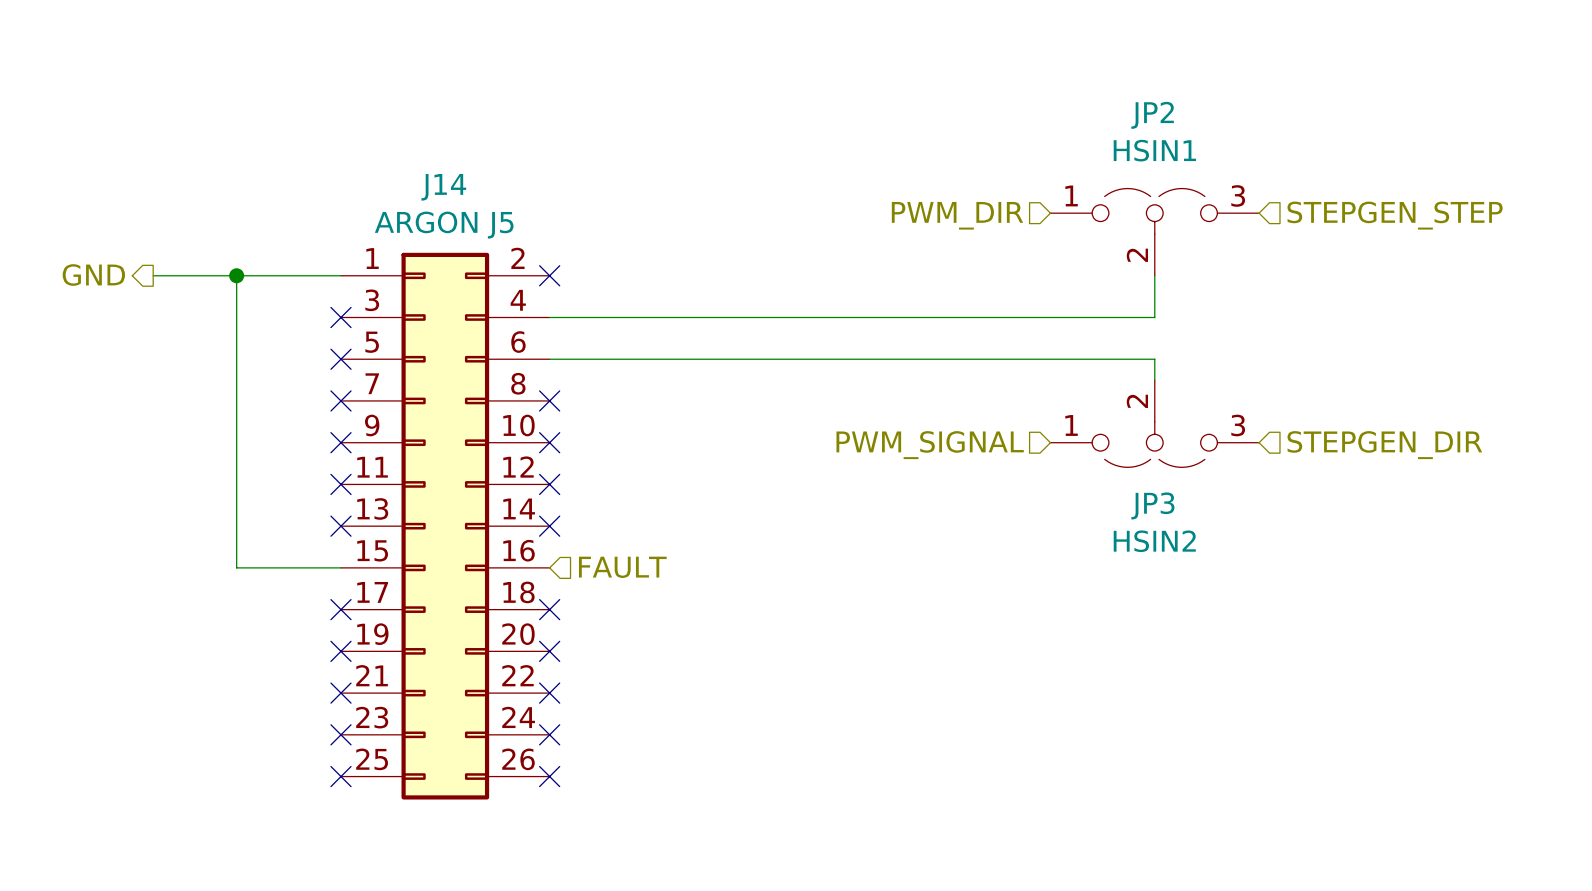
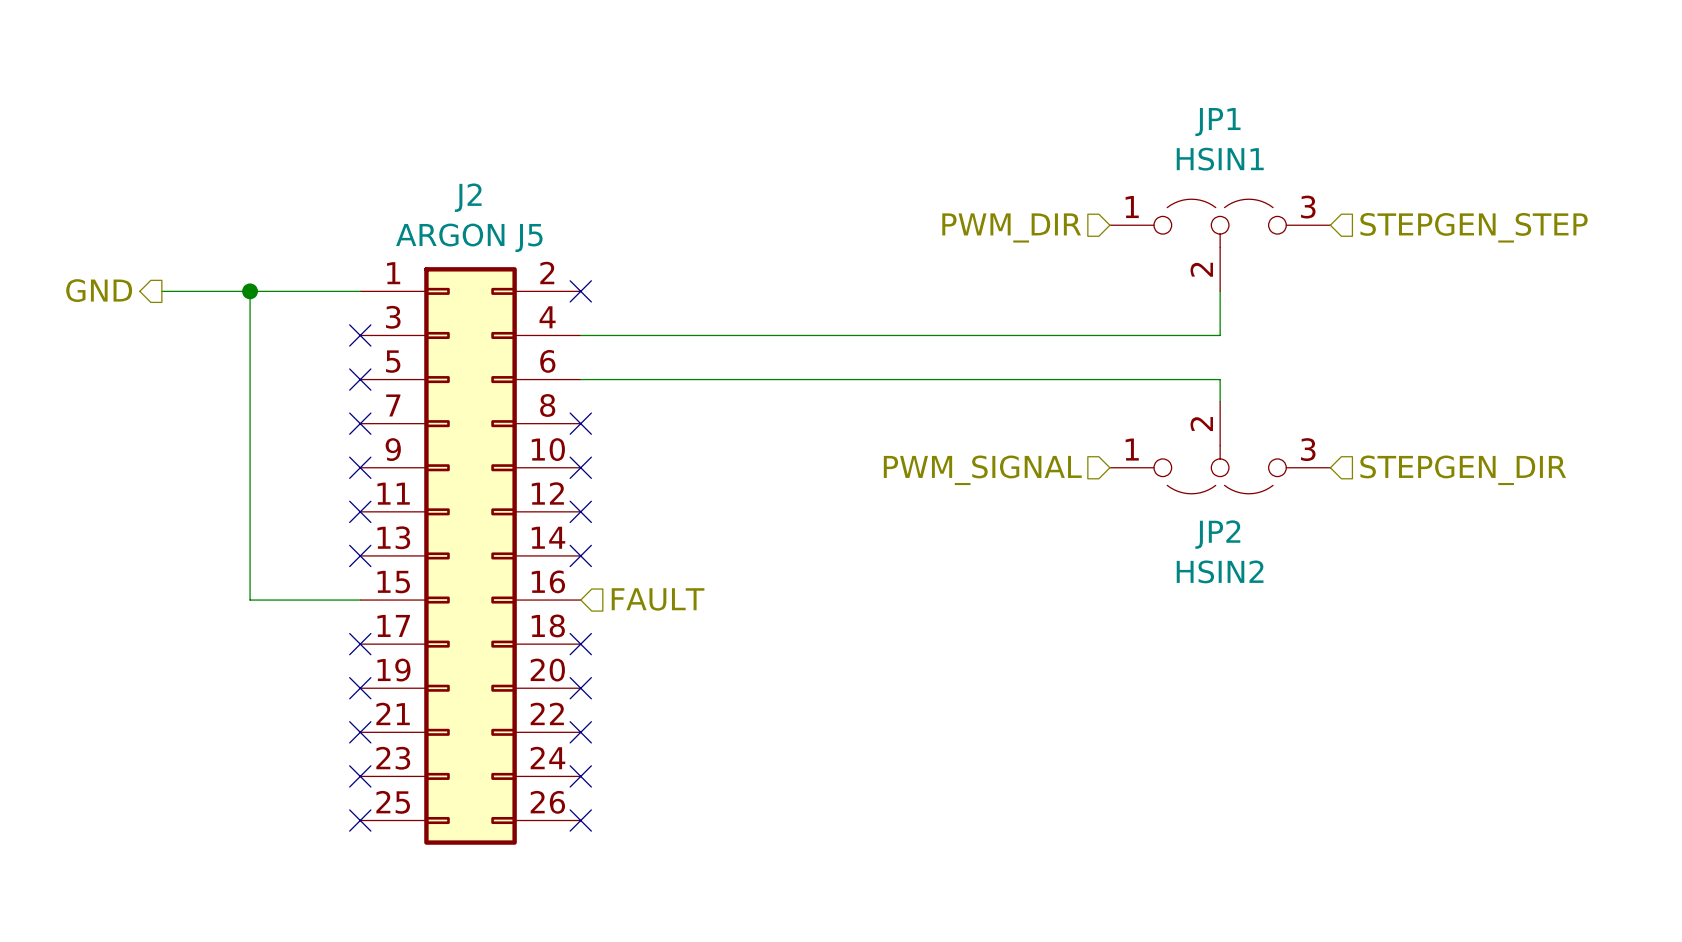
JP2 name: JP2 (1152, 115) -> JP1 (1217, 122)
J14 name: J14 (443, 187) -> J2 (468, 197)
JP3 name: JP3 (1152, 505) -> JP2 (1217, 534)

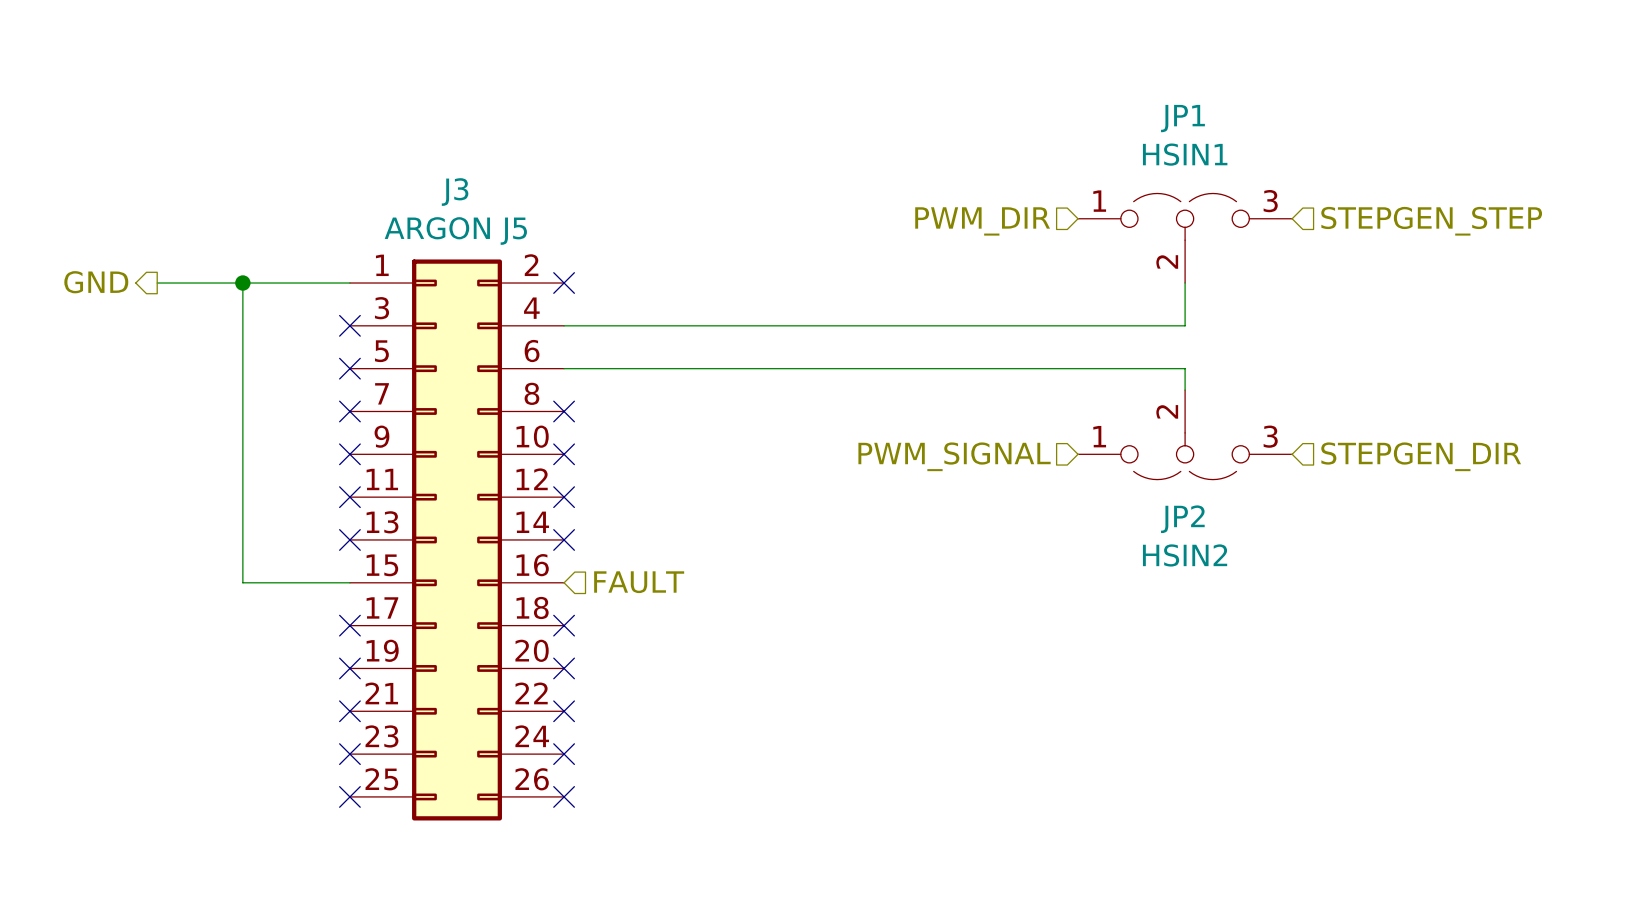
J2 name: J2 (468, 197) -> J3 (455, 192)

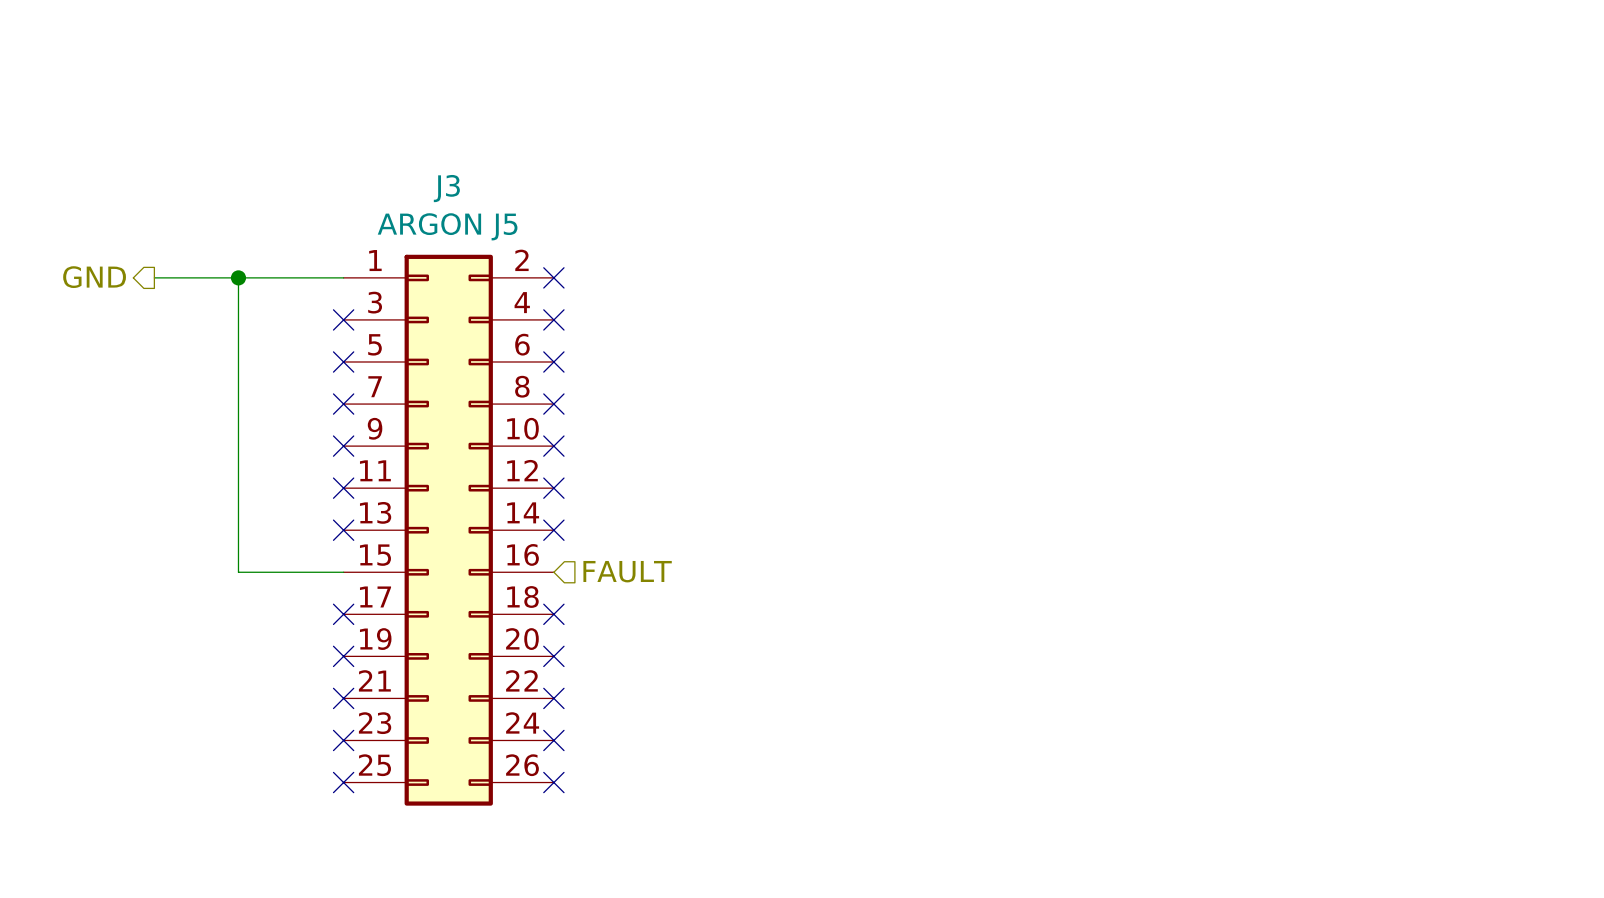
hierarchical label: PWM_DIR (982, 221) -> none
hierarchical label: STEPGEN_STEP (1431, 221) -> none
JP1: HSIN1 (1185, 238) -> none
wire: (1185, 283) (1185, 325) (564, 325) -> none
no-connect mark: none -> (553, 319)
wire: (564, 368) (1185, 368) (1185, 390) -> none
no-connect mark: none -> (553, 361)
JP2: HSIN2 (1185, 434) -> none
hierarchical label: PWM_SIGNAL (954, 456) -> none
hierarchical label: STEPGEN_DIR (1421, 456) -> none

